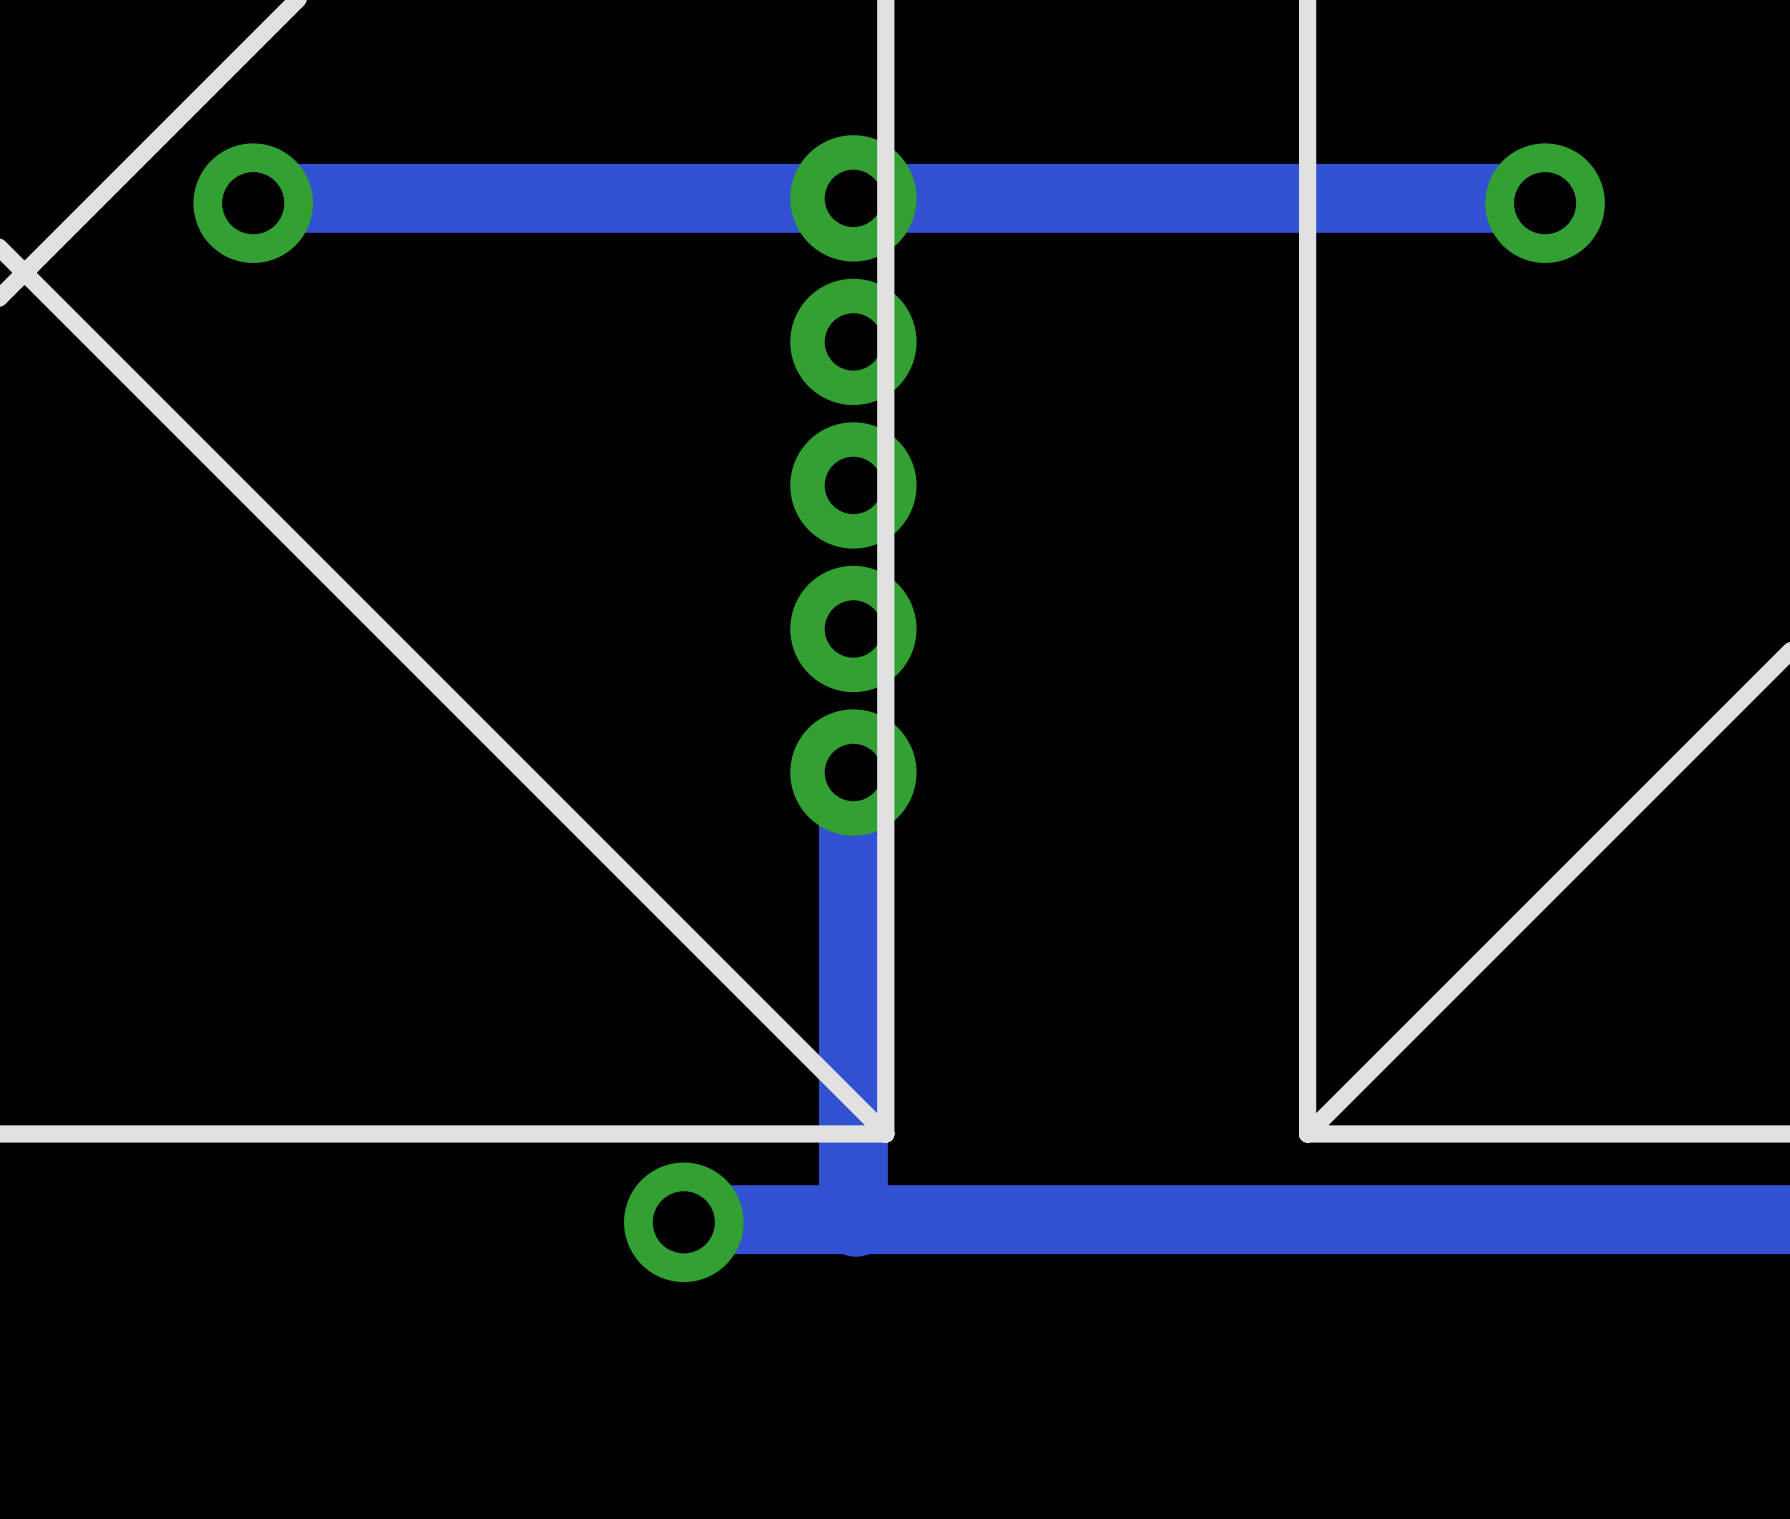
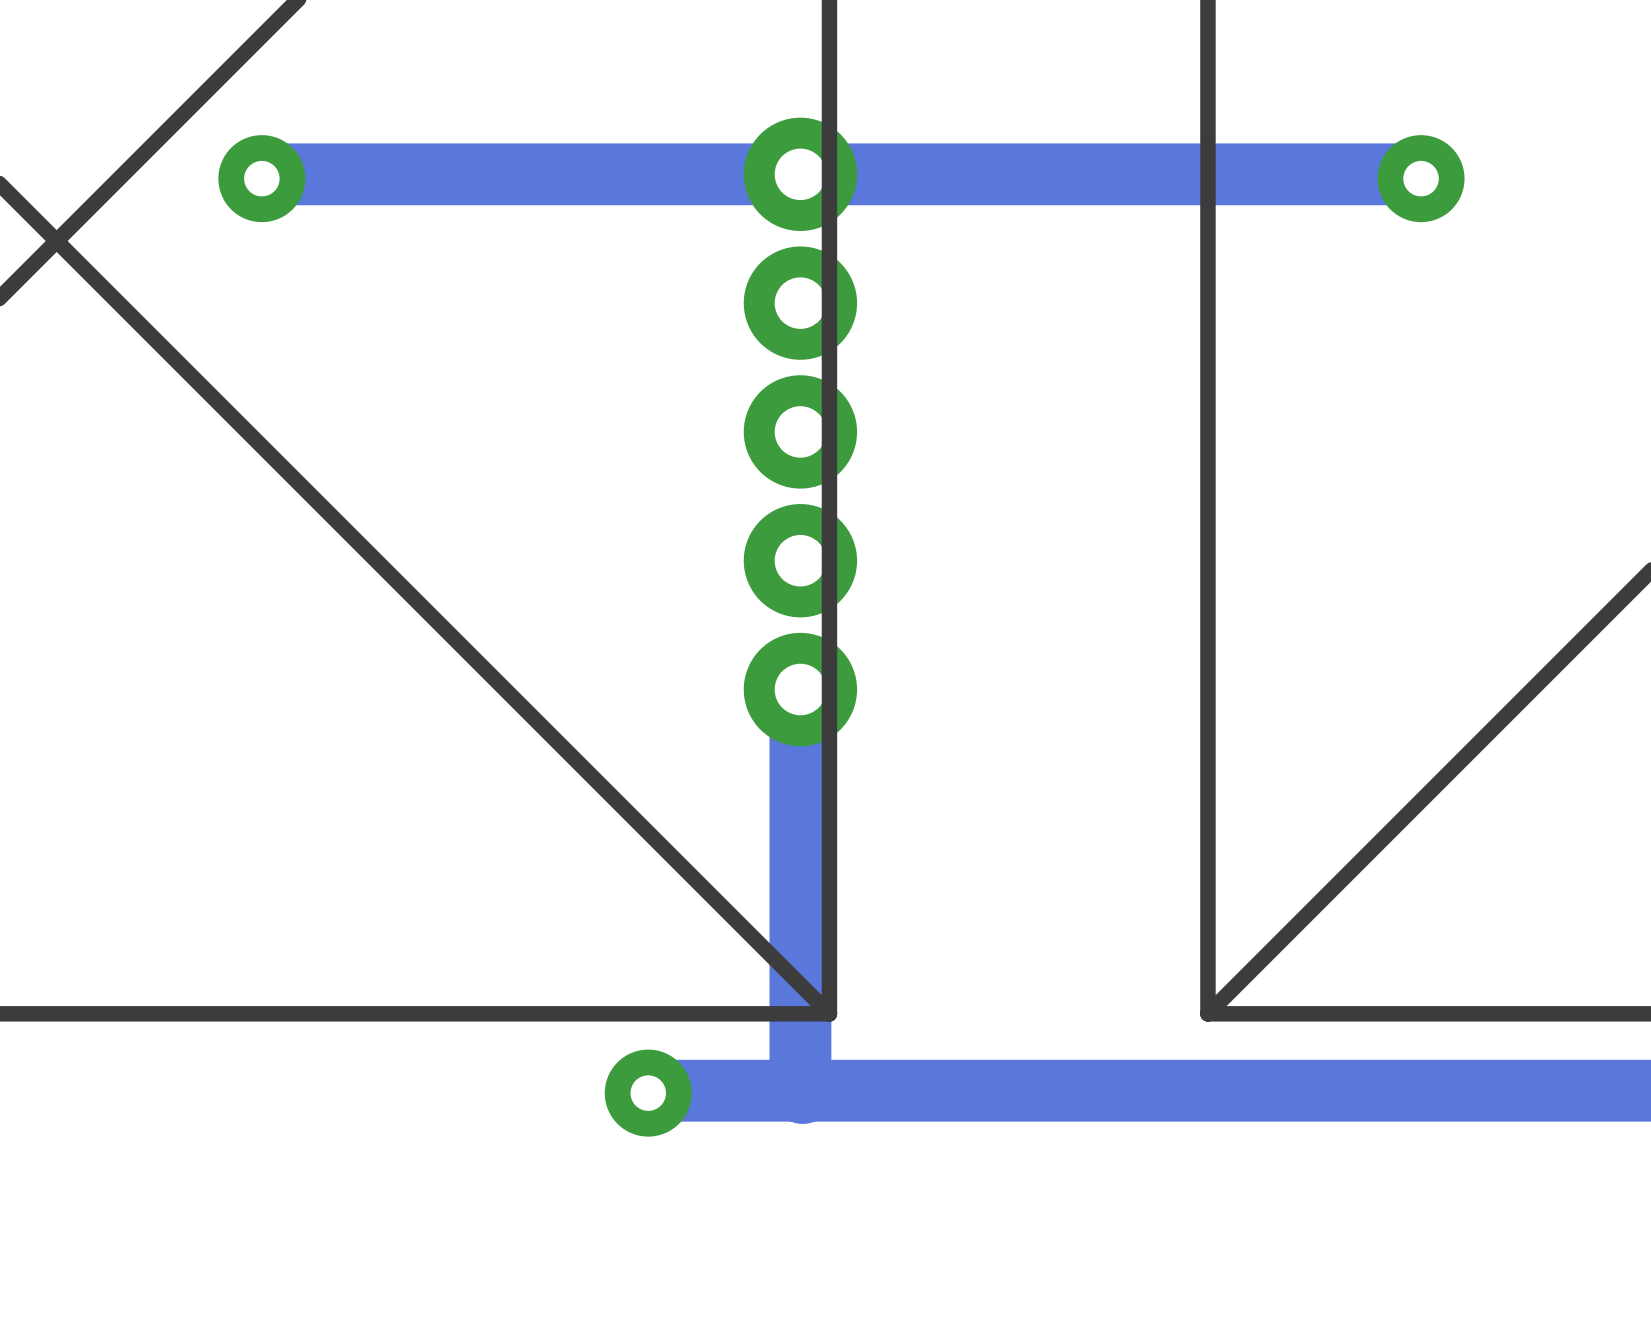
via size: [193, 143, 314, 263] -> [218, 135, 306, 223]
via size: [1485, 143, 1605, 263] -> [1377, 135, 1465, 223]
via size: [624, 1162, 744, 1283] -> [604, 1049, 692, 1137]

